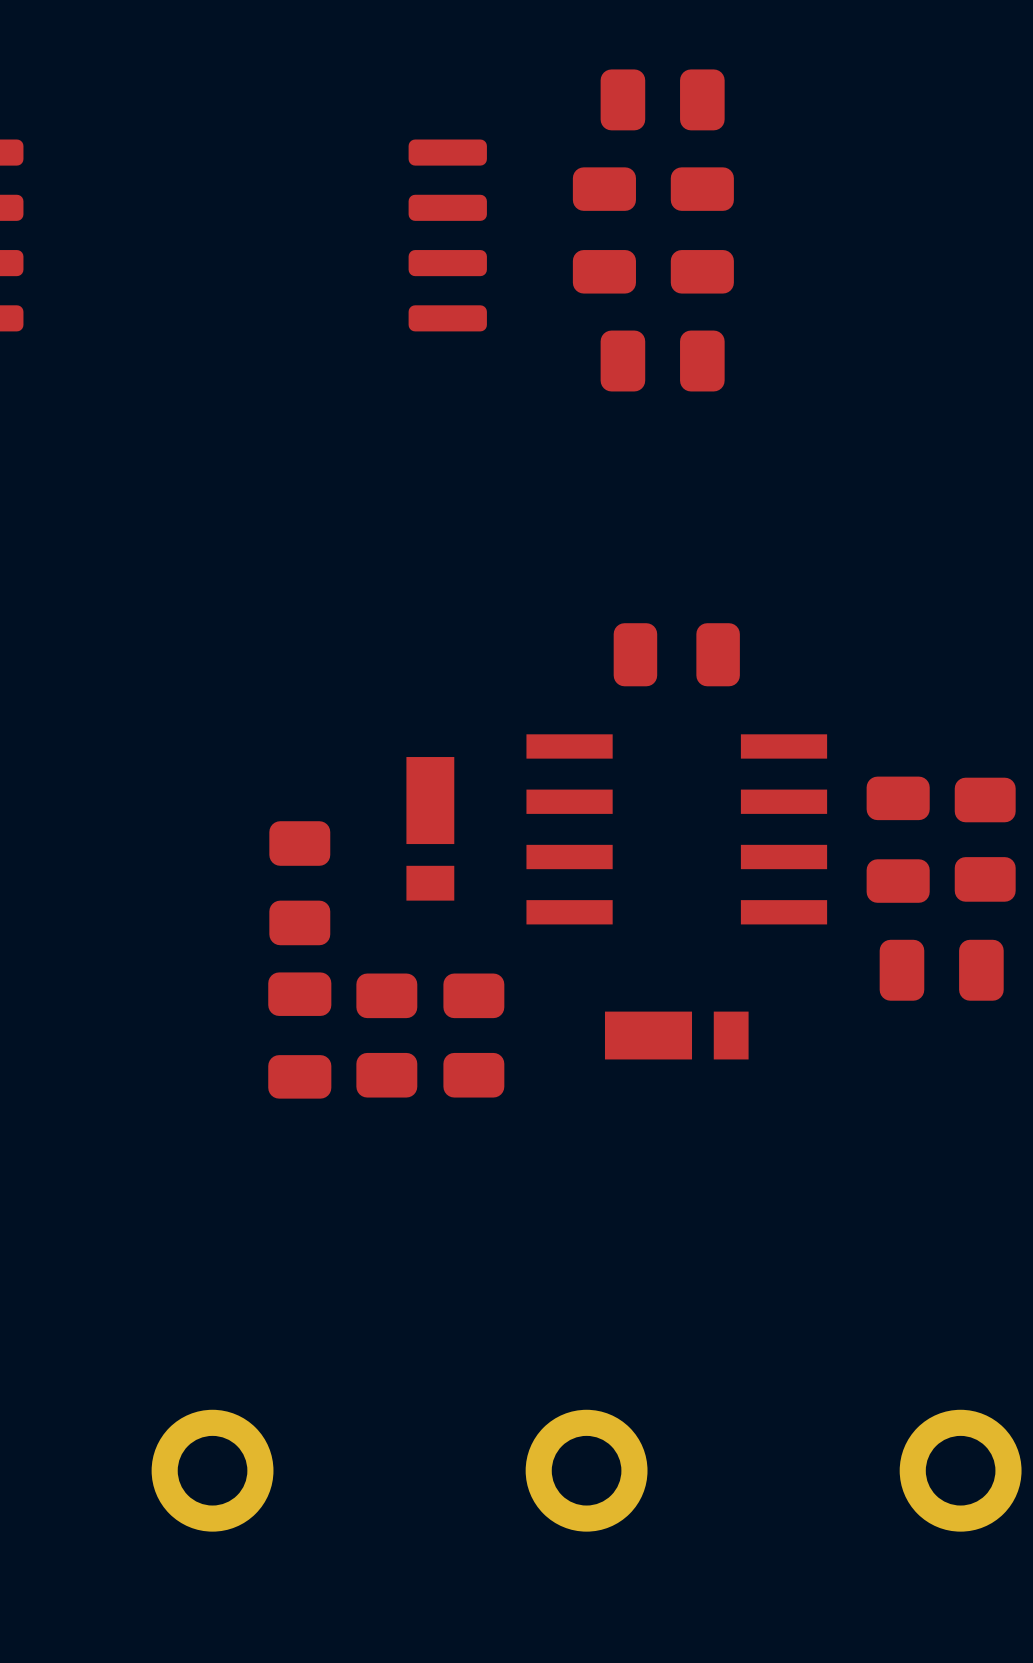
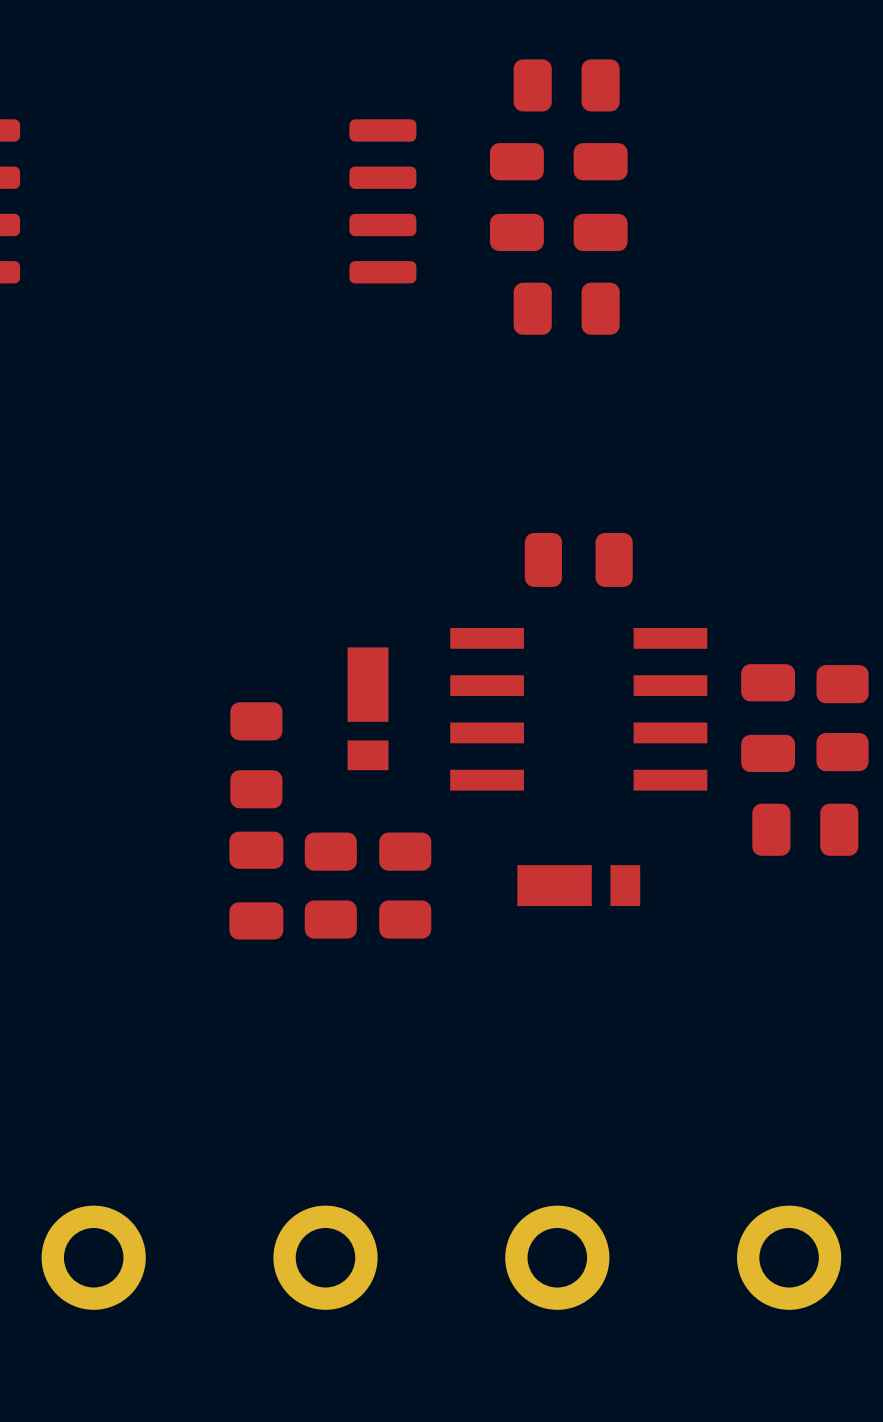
part: none -> (93, 1257)
part: (212, 1470) -> none
part: none -> (325, 1257)
part position: (586, 1470) -> (557, 1257)
part position: (960, 1470) -> (789, 1257)

